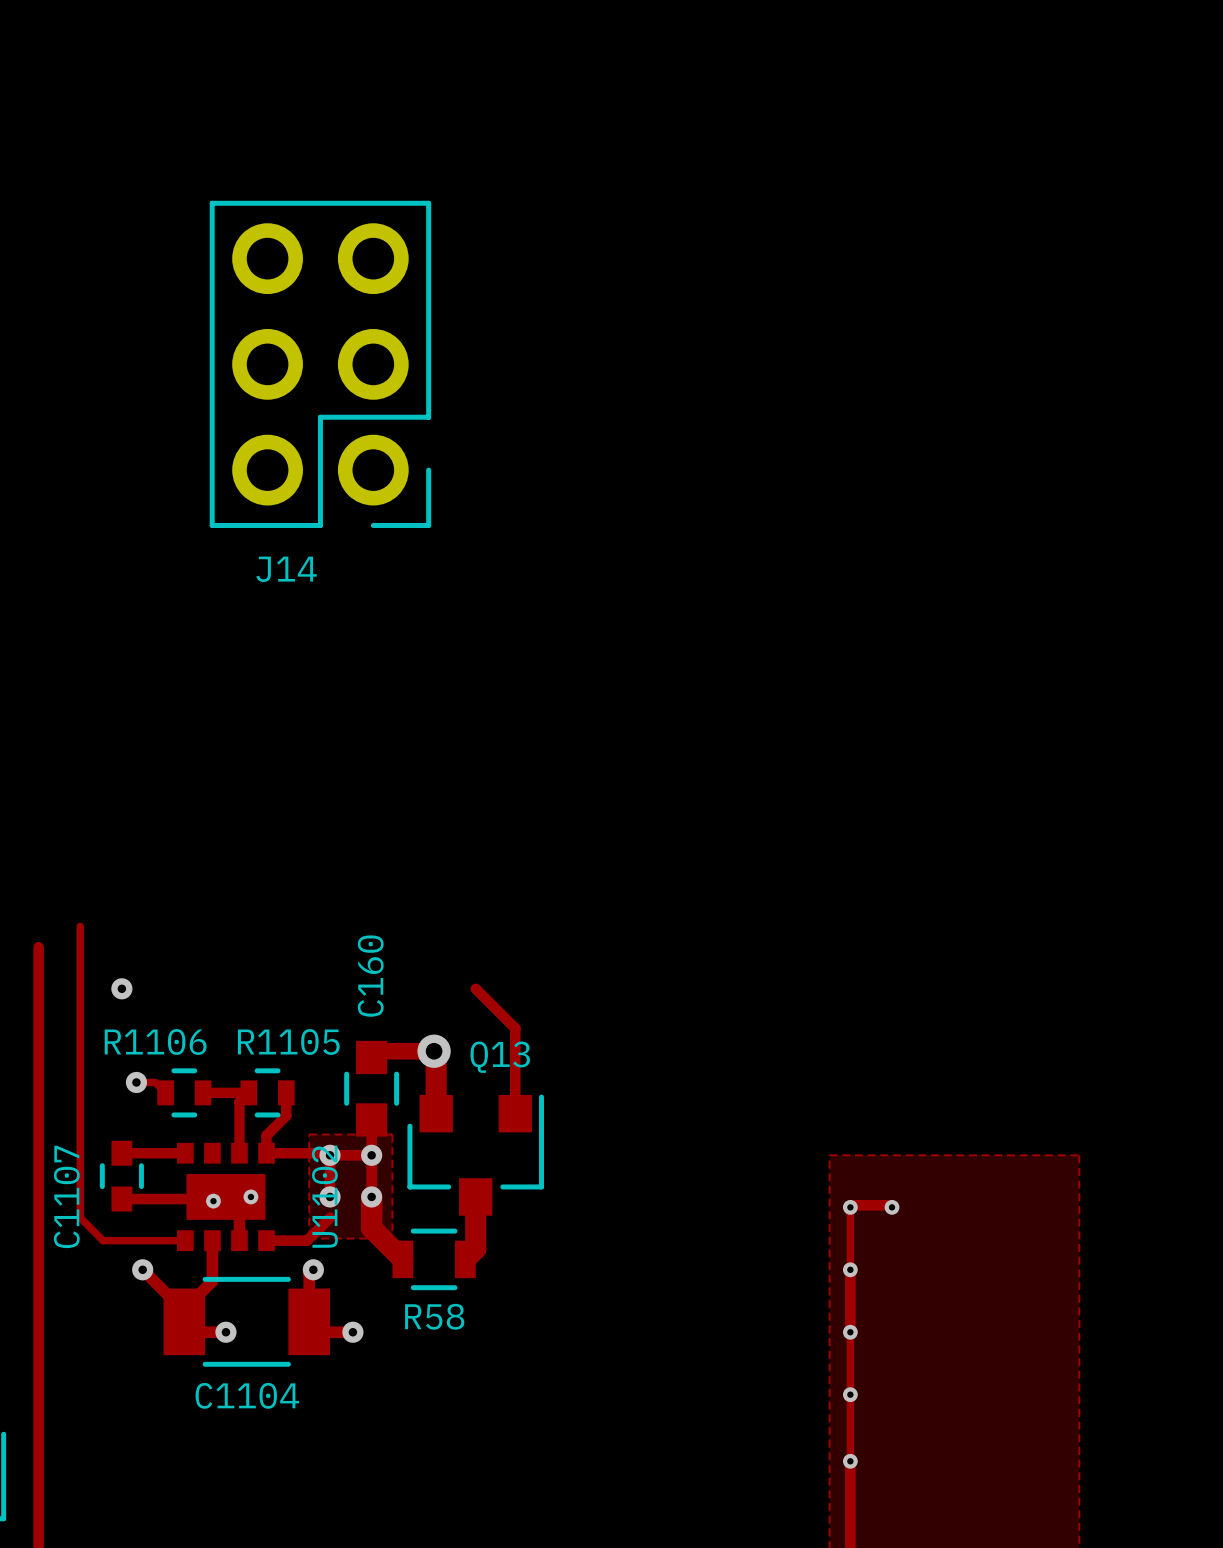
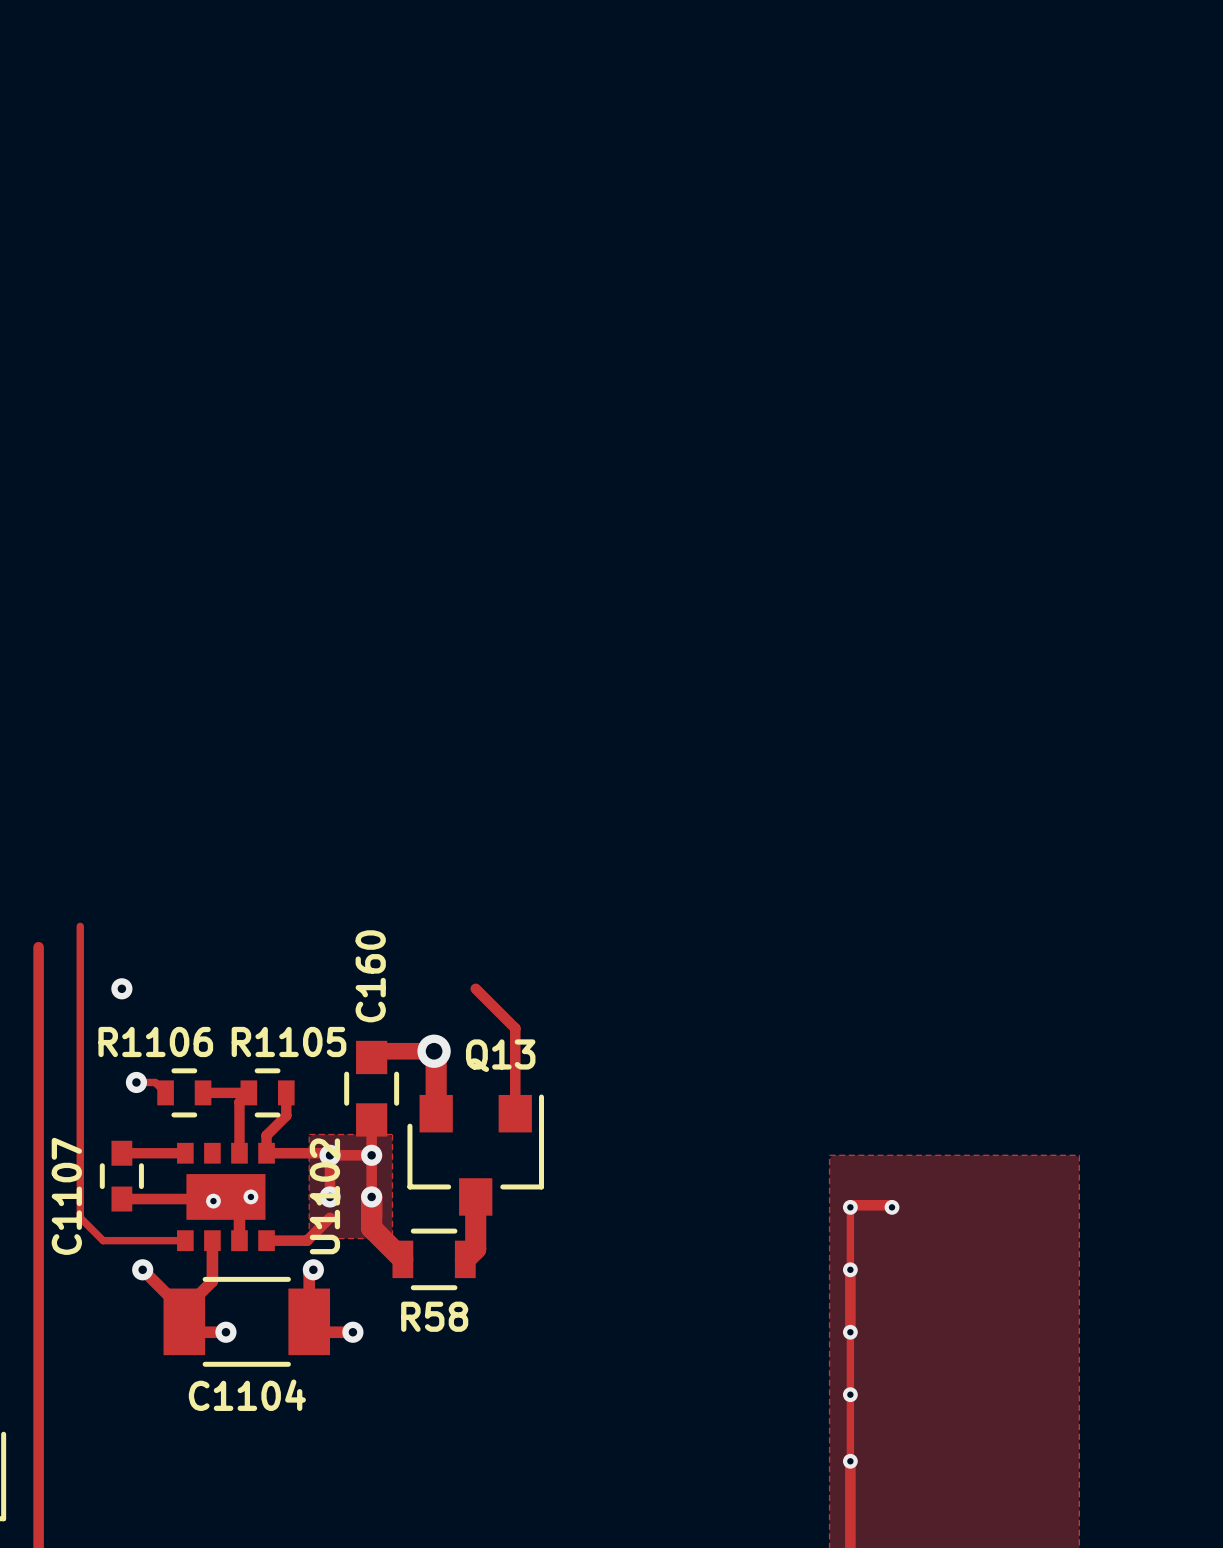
J14: (320, 364) -> none

